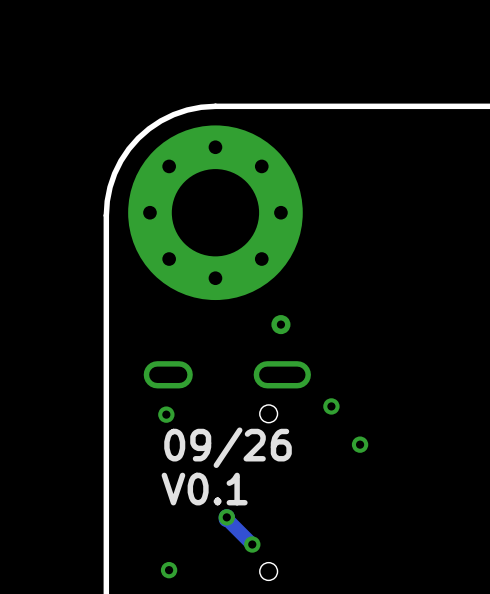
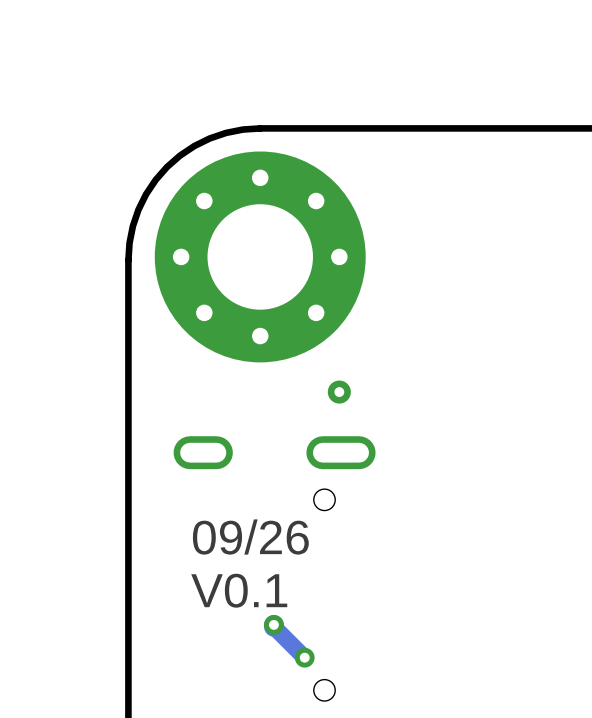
via: (331, 406) -> none
via: (166, 414) -> none
via: (360, 444) -> none
via: (169, 570) -> none

